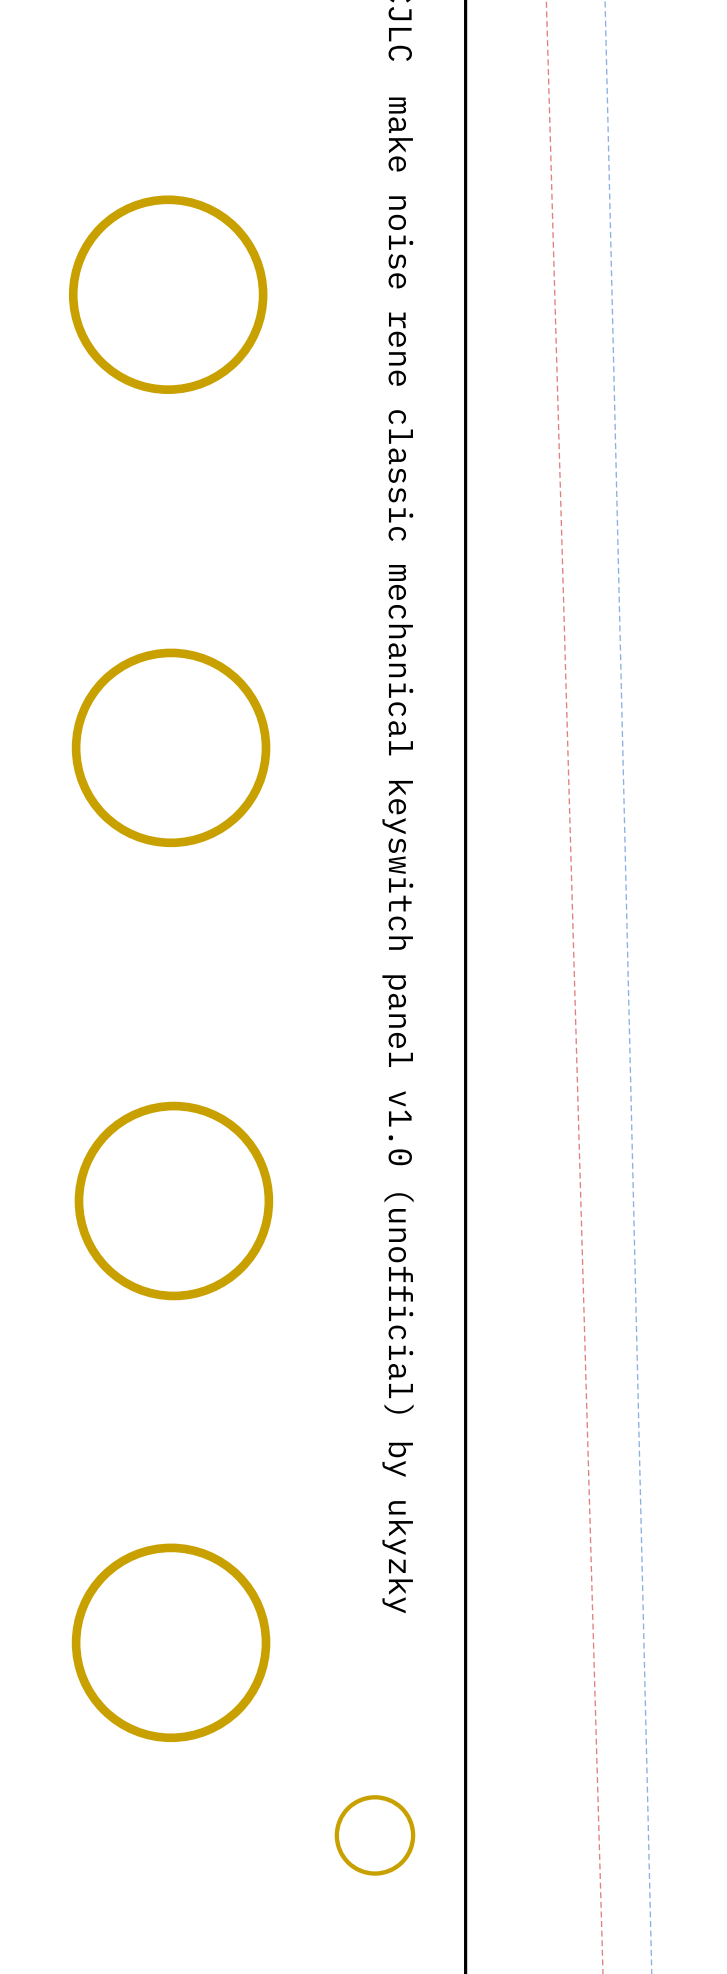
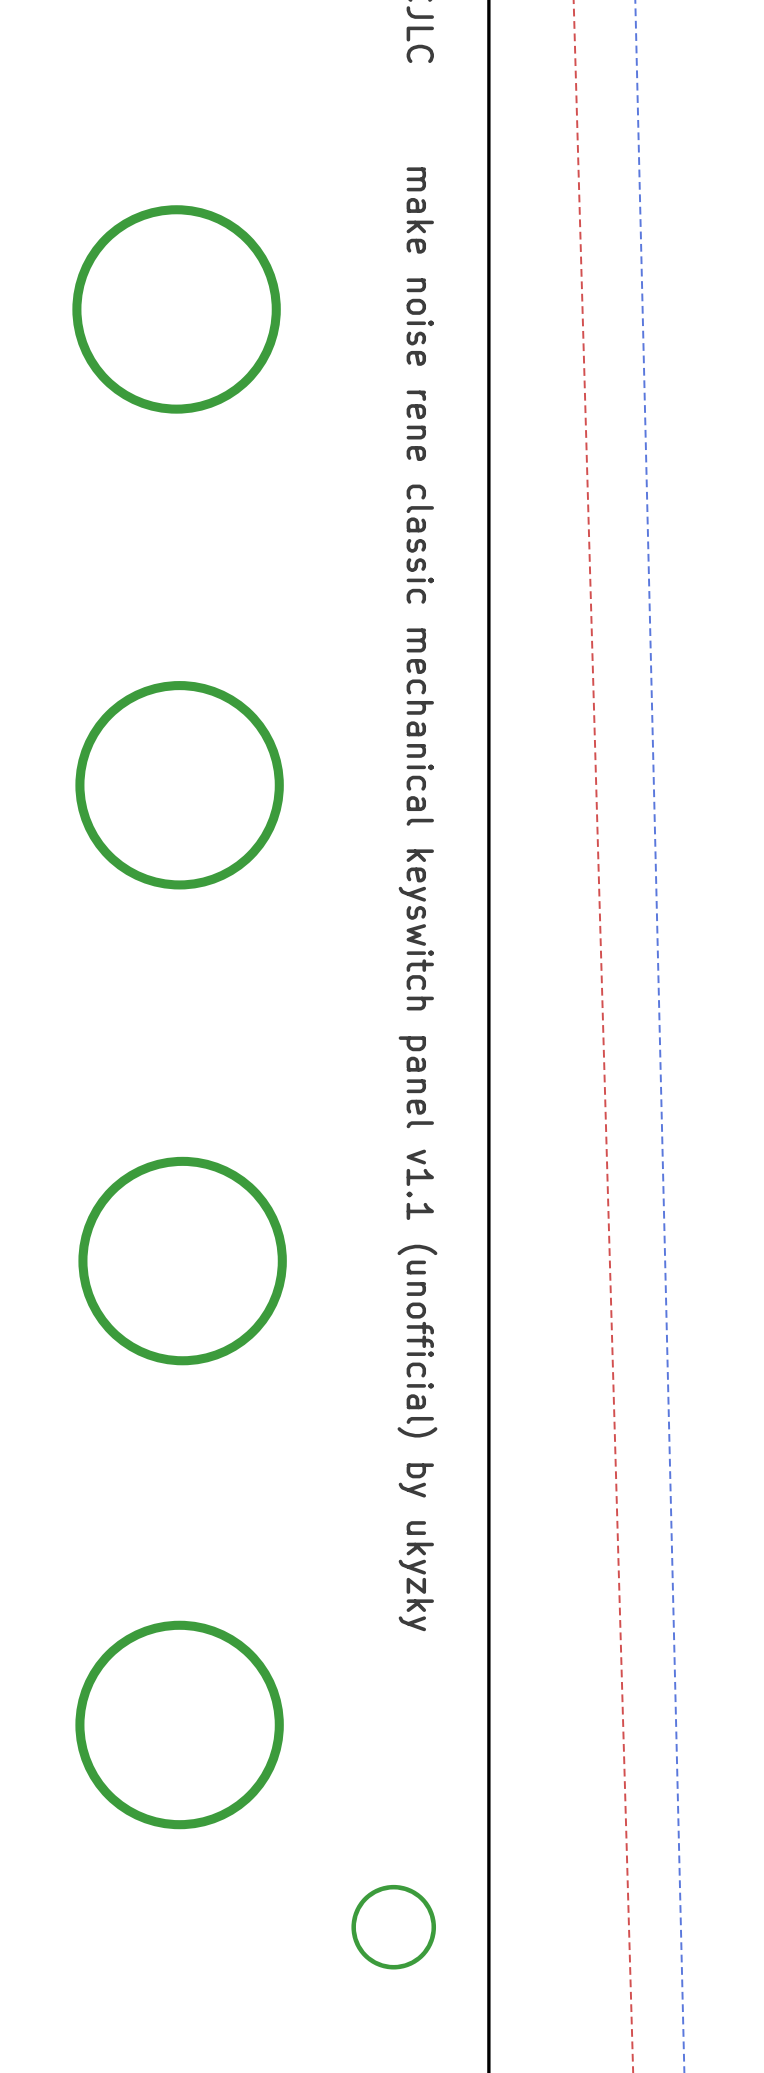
text: make noise rene classic mechanical keyswitch panel v1.0 (unofficial) by ukyzky (398, 855) -> make noise rene classic mechanical keyswitch panel v1.1 (unofficial) by ukyzky (417, 899)

